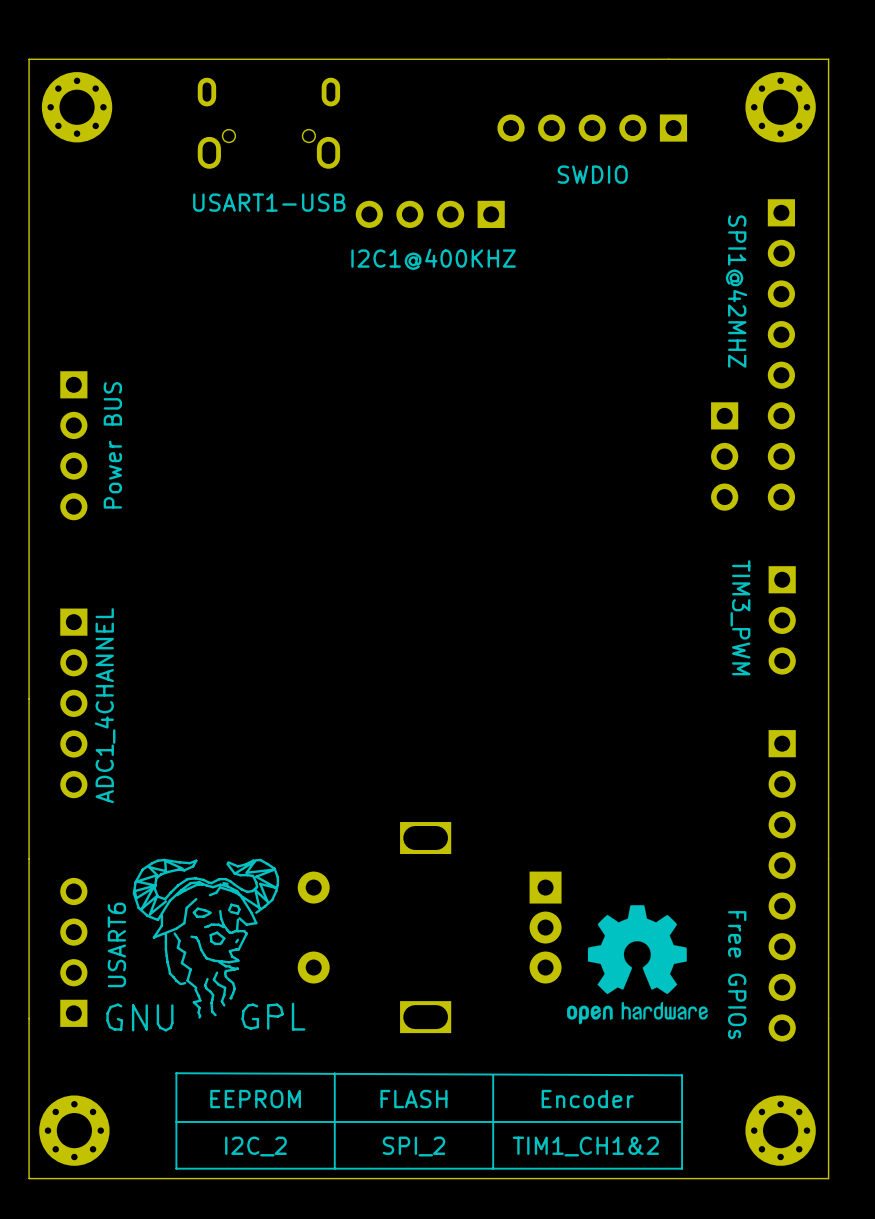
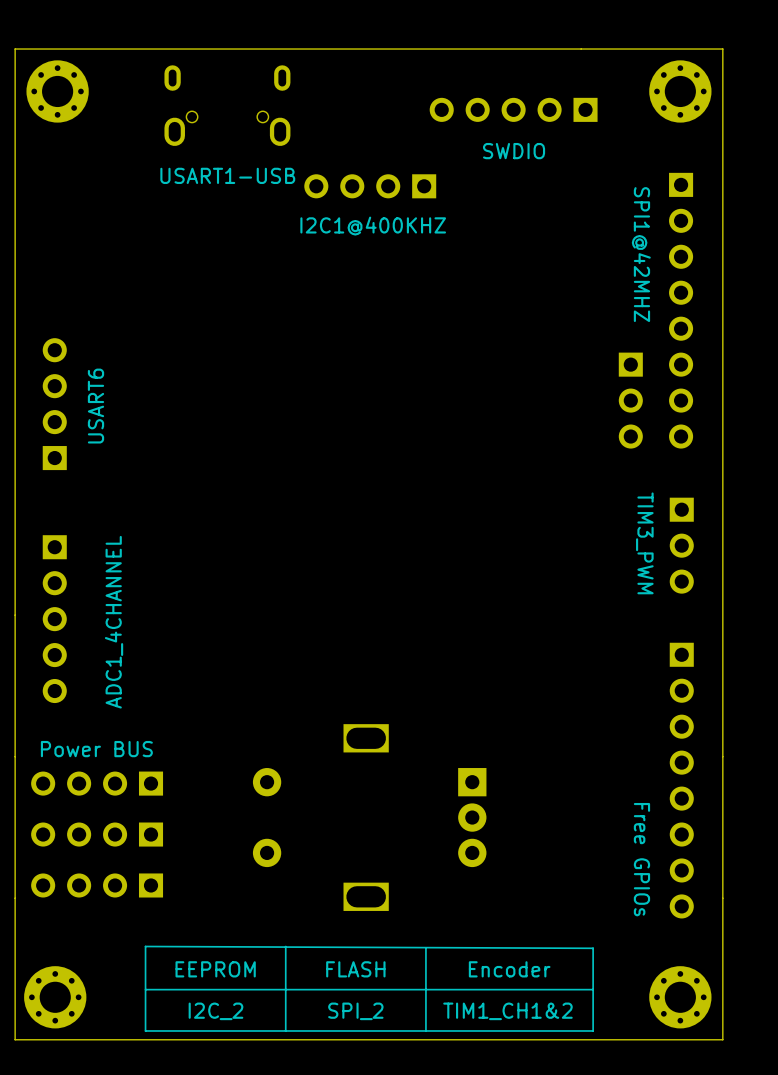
part rotation: 0° (73, 445) -> 180° (54, 404)
text: Power BUS (112, 445) -> none
text: none -> USART6 (95, 406)
text position: ADC1_4CHANNEL (105, 705) -> ADC1_4CHANNEL (114, 622)
text: none -> Power BUS (96, 749)
drawing: [106, 858, 306, 1032] -> none
part: none -> (97, 783)
drawing: [566, 905, 708, 1025] -> none
text: USART6 (116, 944) -> none
part: none -> (97, 834)
part: (73, 952) -> none
part: none -> (97, 885)

